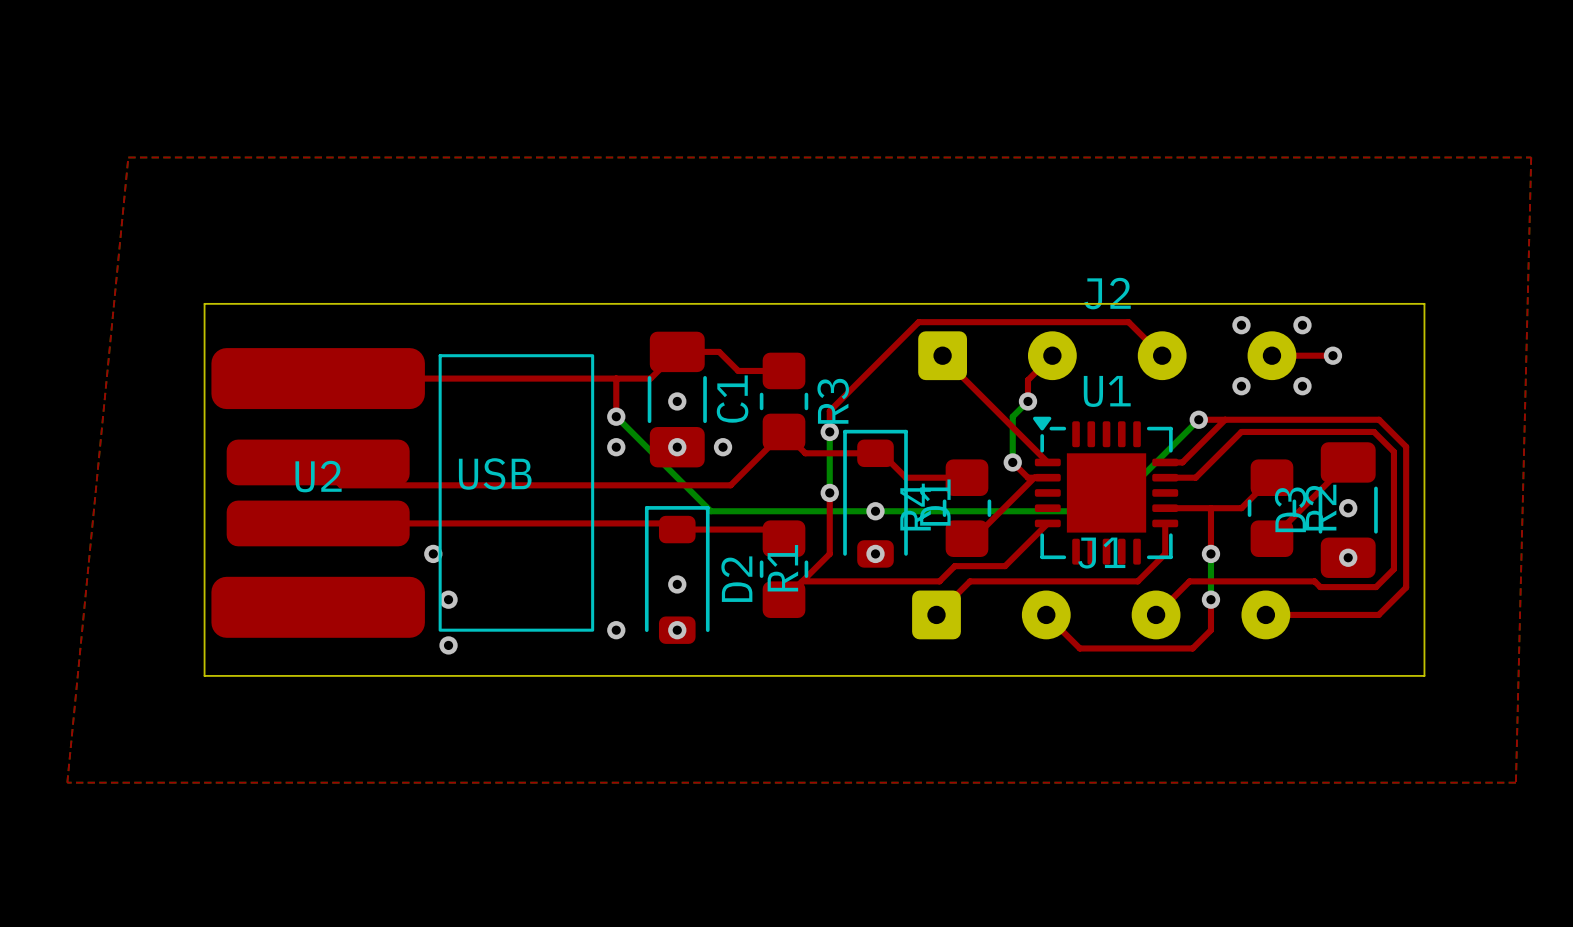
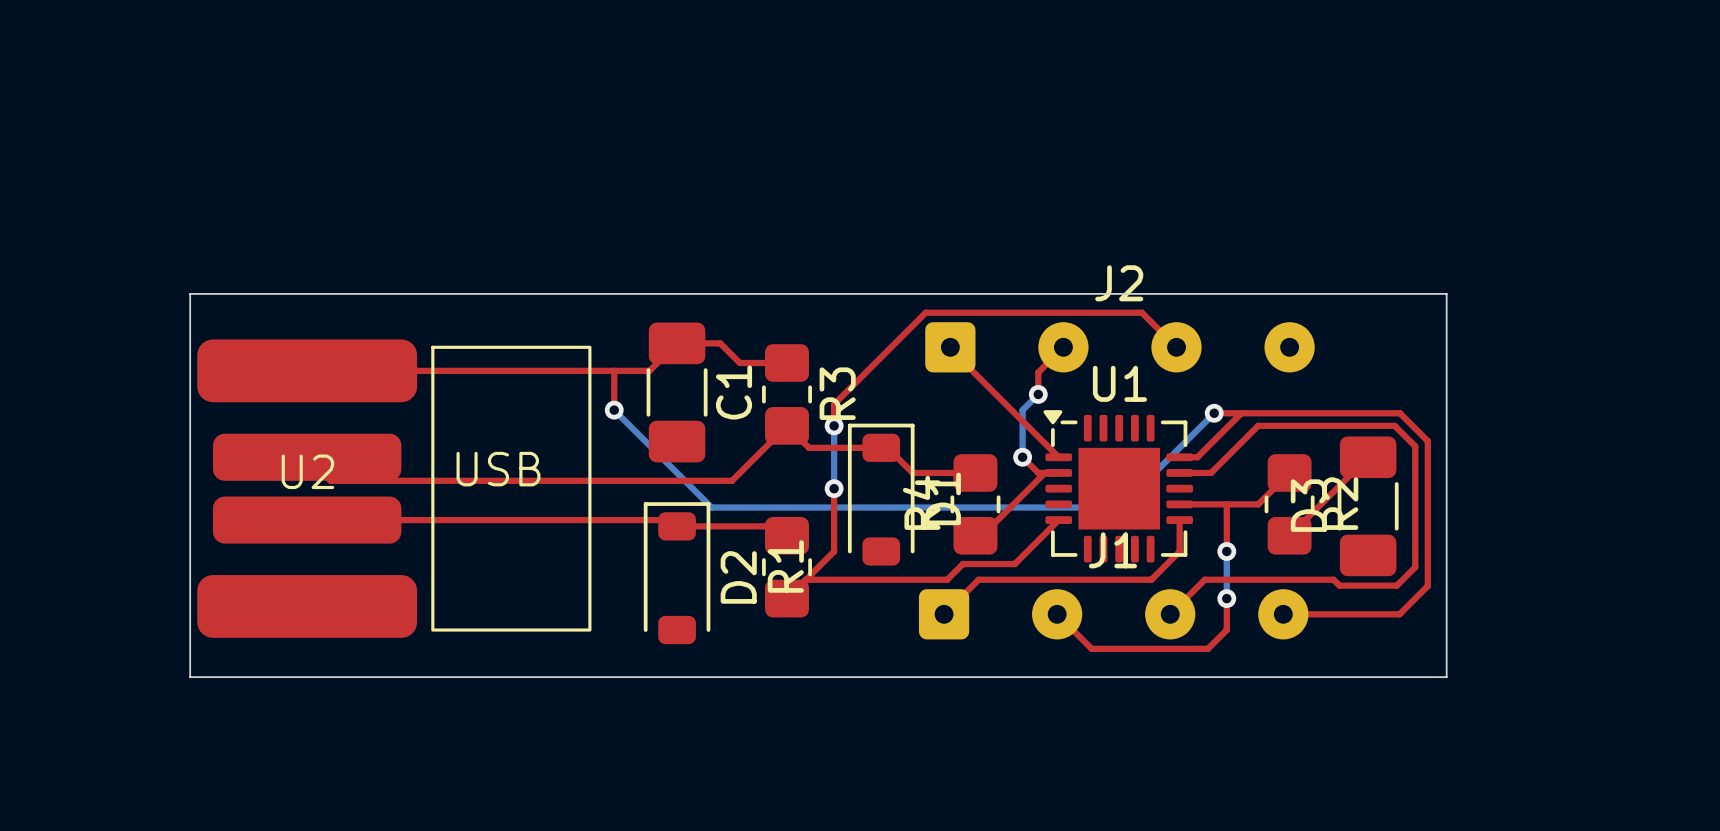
top zone outline: (128, 157) (1531, 157) (1515, 782) (67, 782) (128, 157) -> none
via: (1241, 325) -> none
via: (1302, 325) -> none
top track: (1271, 355) (1332, 355) -> none
via: (1332, 355) -> none
via: (1241, 386) -> none
via: (1302, 386) -> none
via: (677, 401) -> none
via: (616, 447) -> none
via: (677, 447) -> none
via: (723, 447) -> none
via: (1348, 508) -> none
via: (875, 511) -> none
via: (433, 553) -> none
via: (875, 553) -> none
via: (1348, 557) -> none
via: (677, 584) -> none
via: (448, 599) -> none
via: (616, 630) -> none
via: (677, 630) -> none
via: (448, 645) -> none

